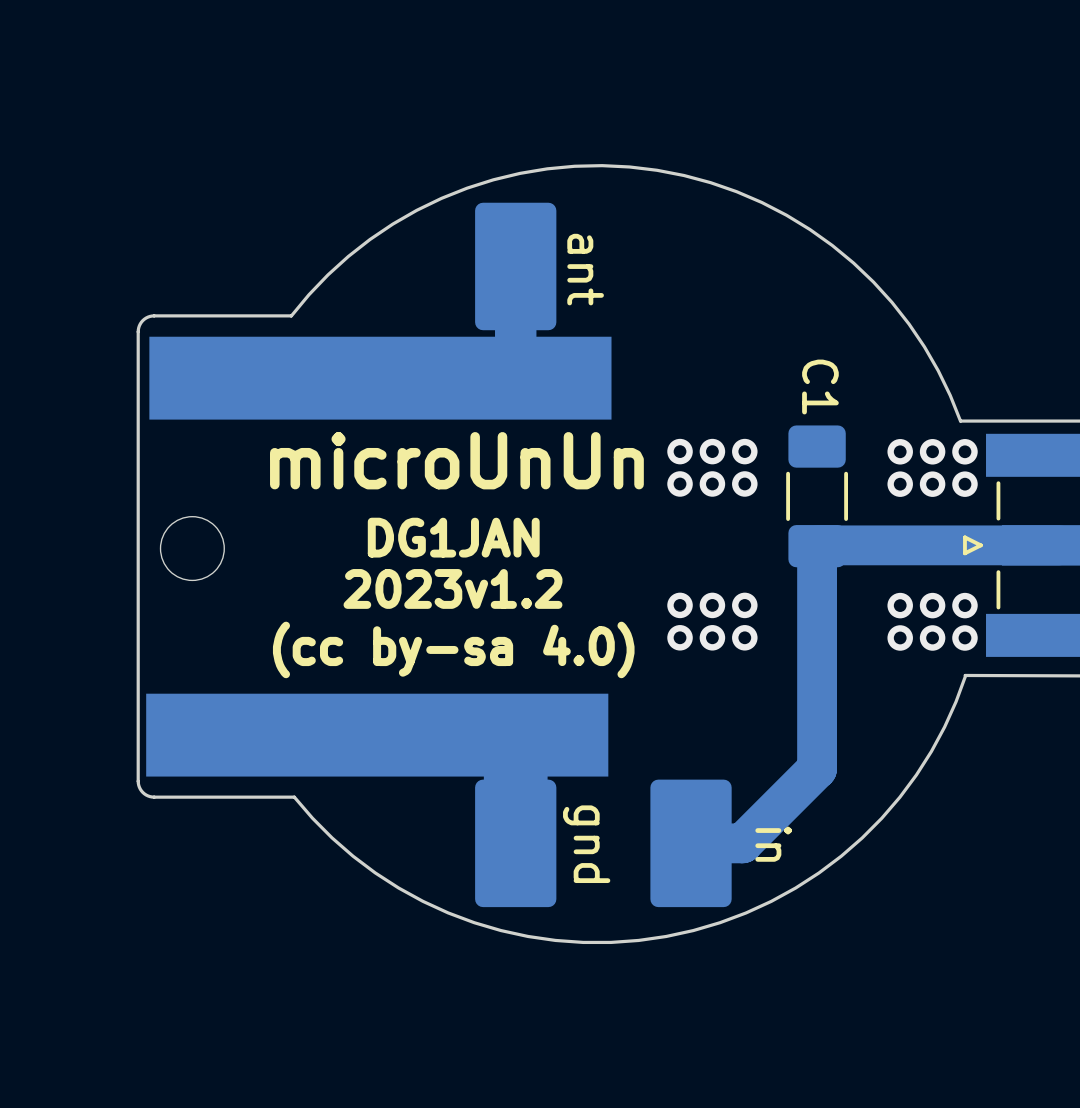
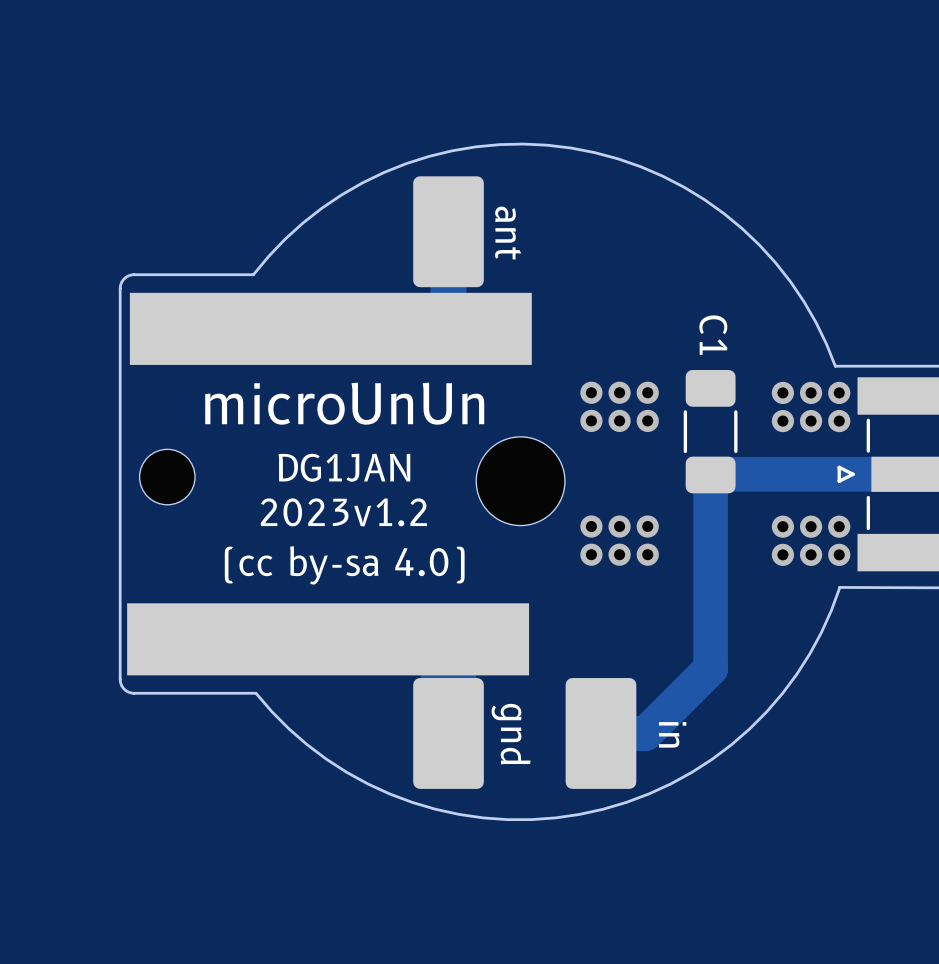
text position: microUnUn (456, 460) -> microUnUn (344, 403)
text position: DG1JAN (453, 537) -> DG1JAN (344, 467)
part: none -> (520, 481)
text position: 2023v1.2 (452, 588) -> 2023v1.2 (343, 512)
text position: (cc by-sa 4.0) (453, 649) -> (cc by-sa 4.0) (344, 565)

